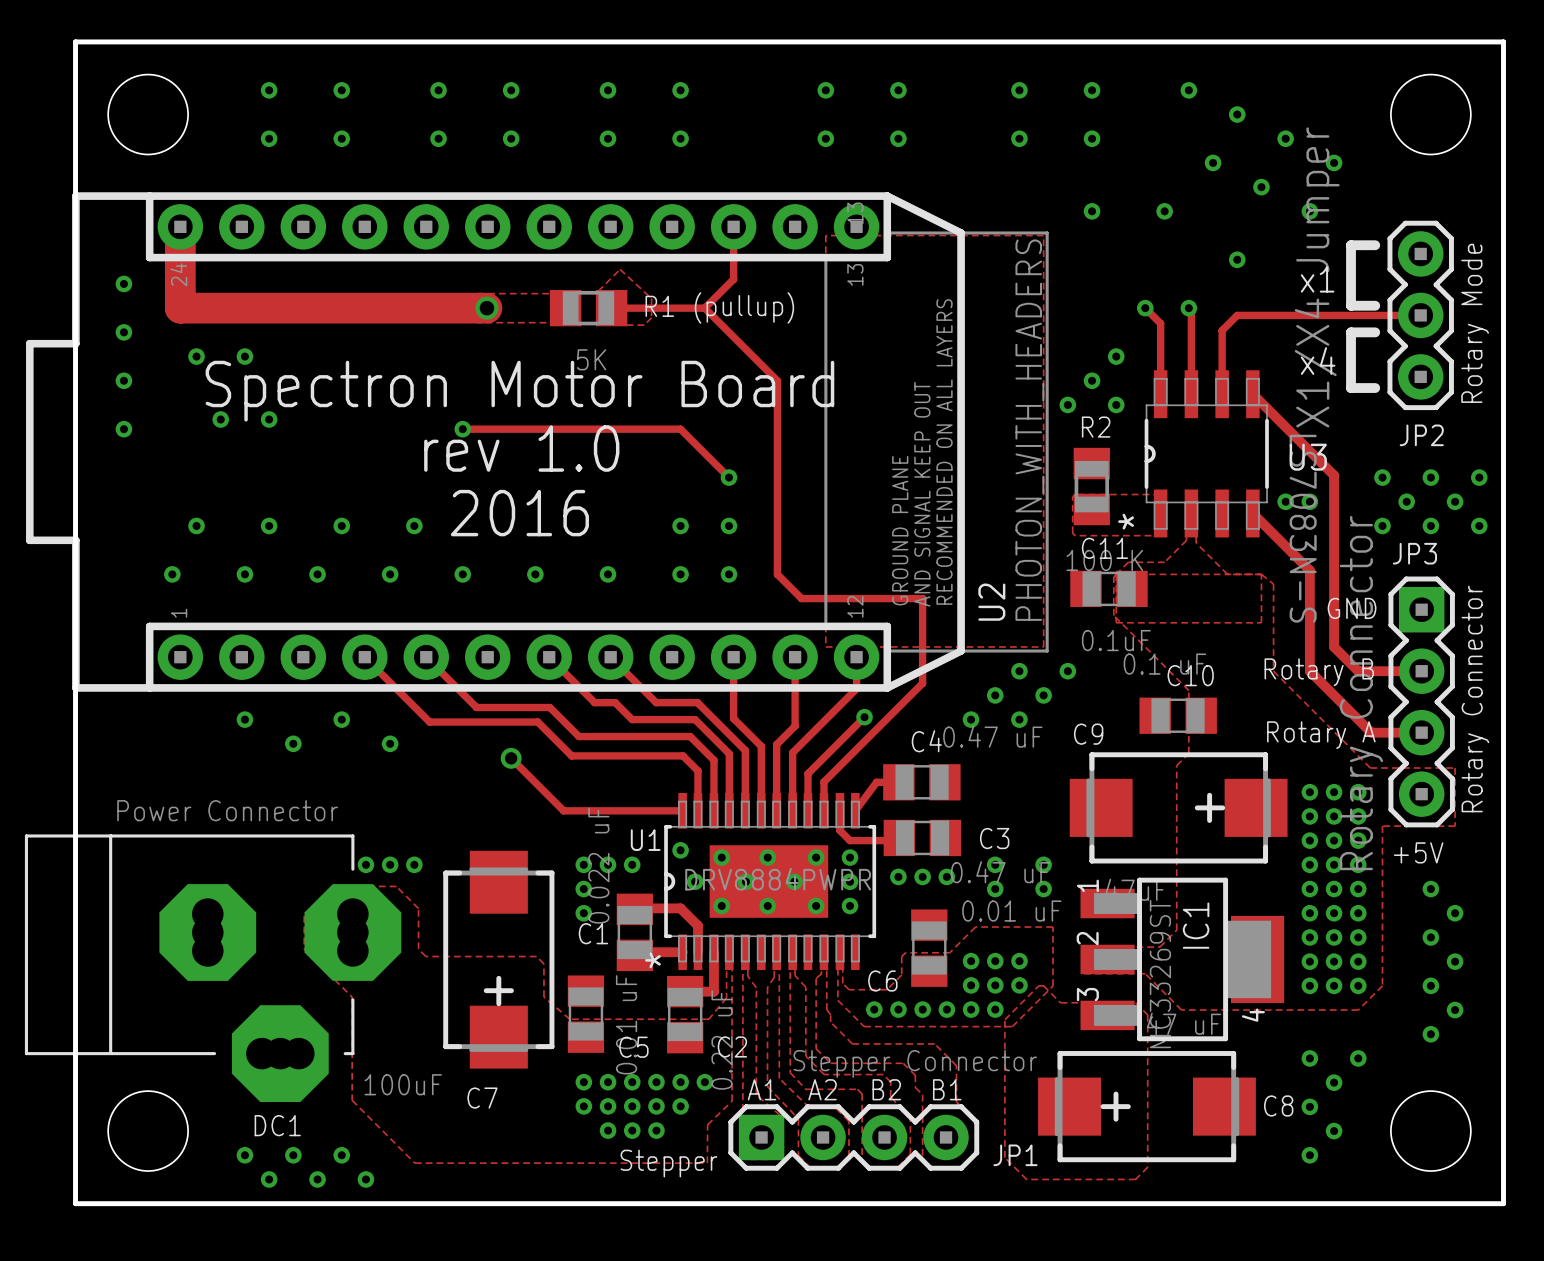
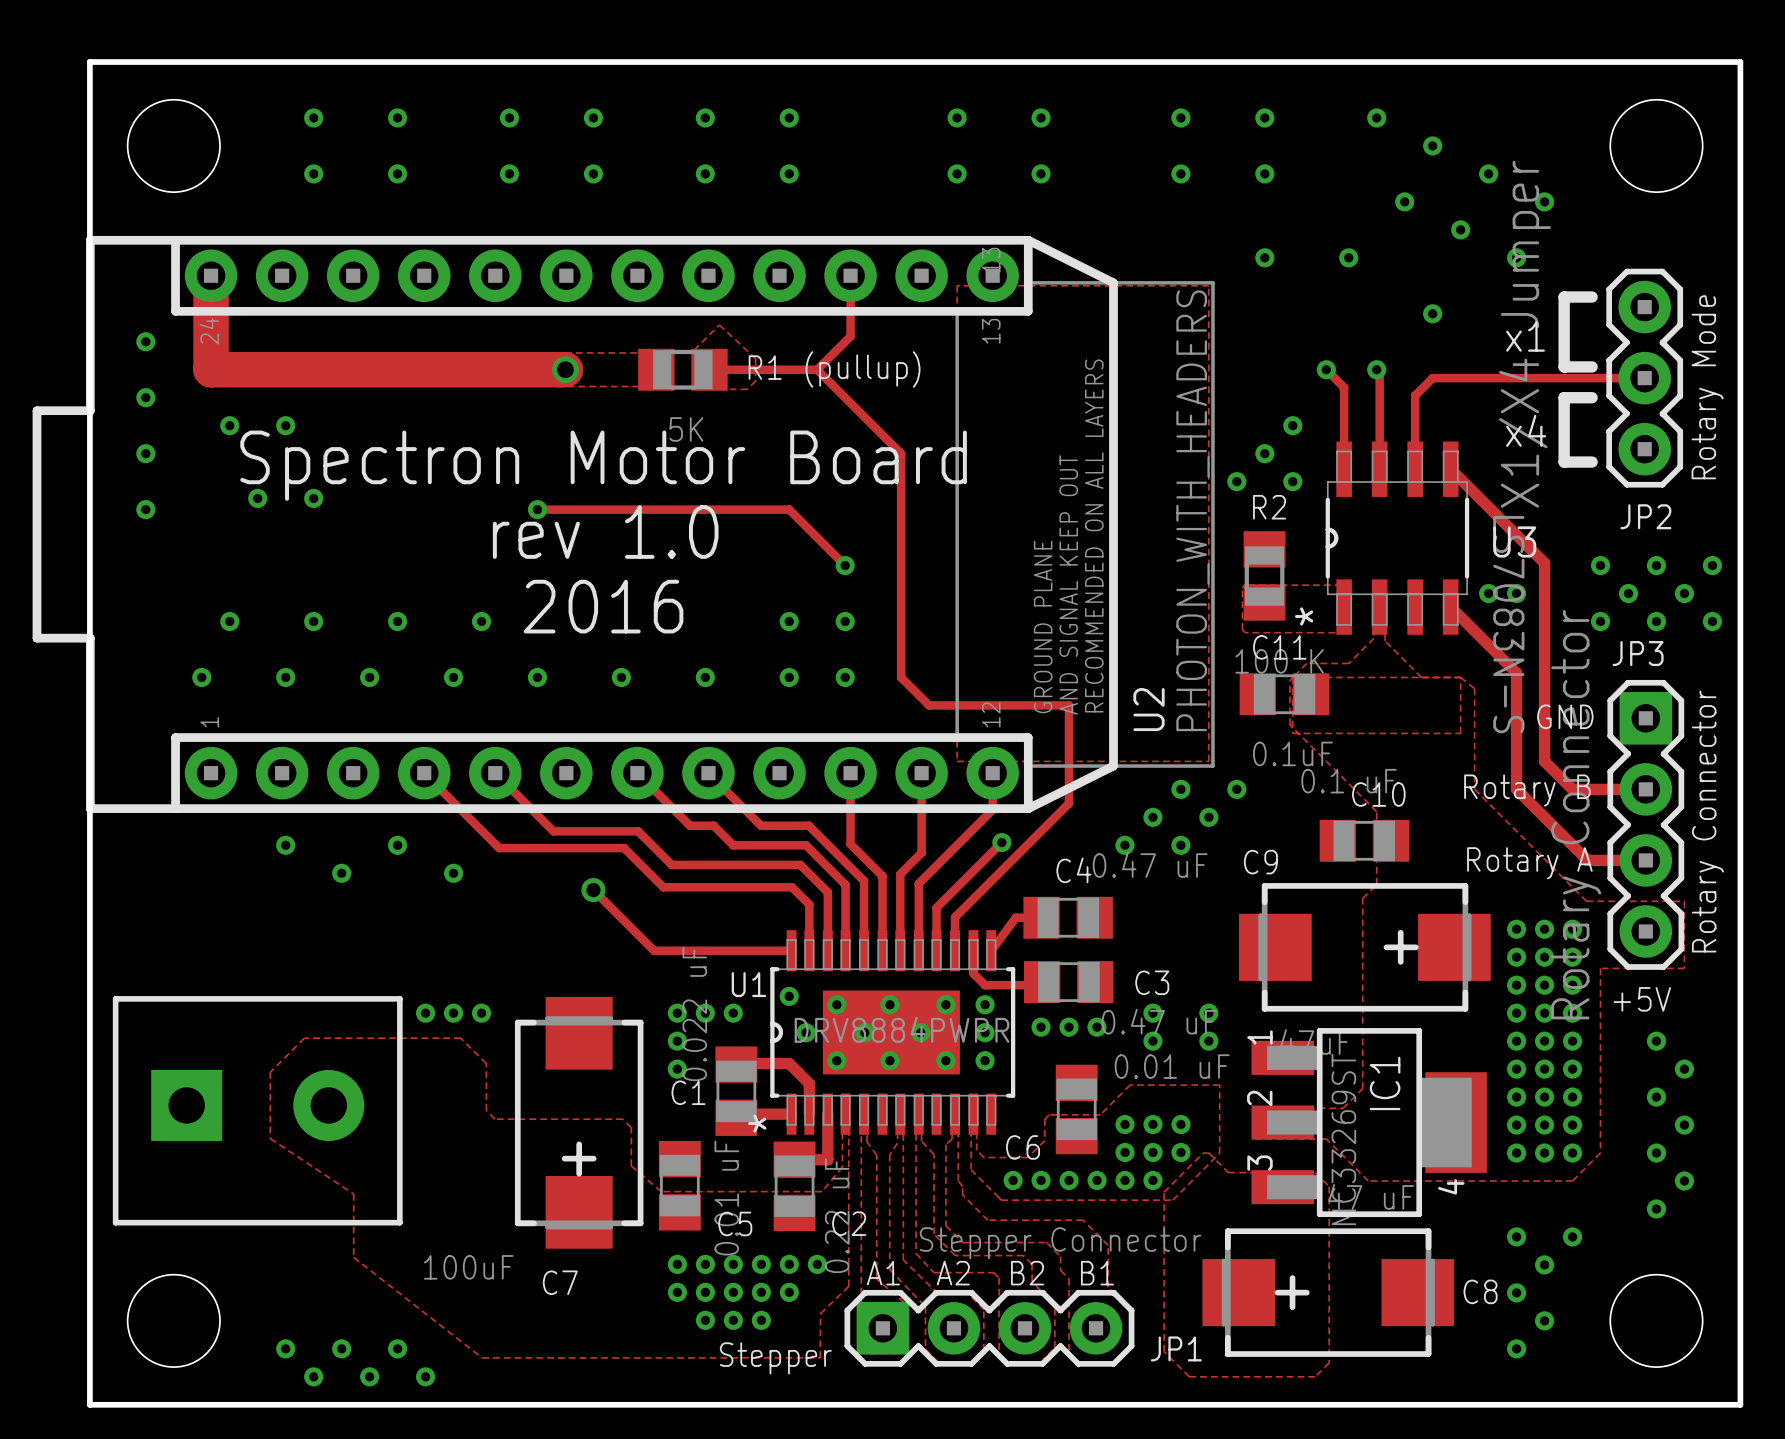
zone outline: (333, 886) (304, 915) (304, 949) (352, 997) (352, 1100) (414, 1163) -> (388, 1038) (304, 1038) (270, 1072) (270, 1138) (353, 1194) (353, 1257) (482, 1357)
part: none -> (257, 1110)
DC1: Power Connector (213, 968) -> none

